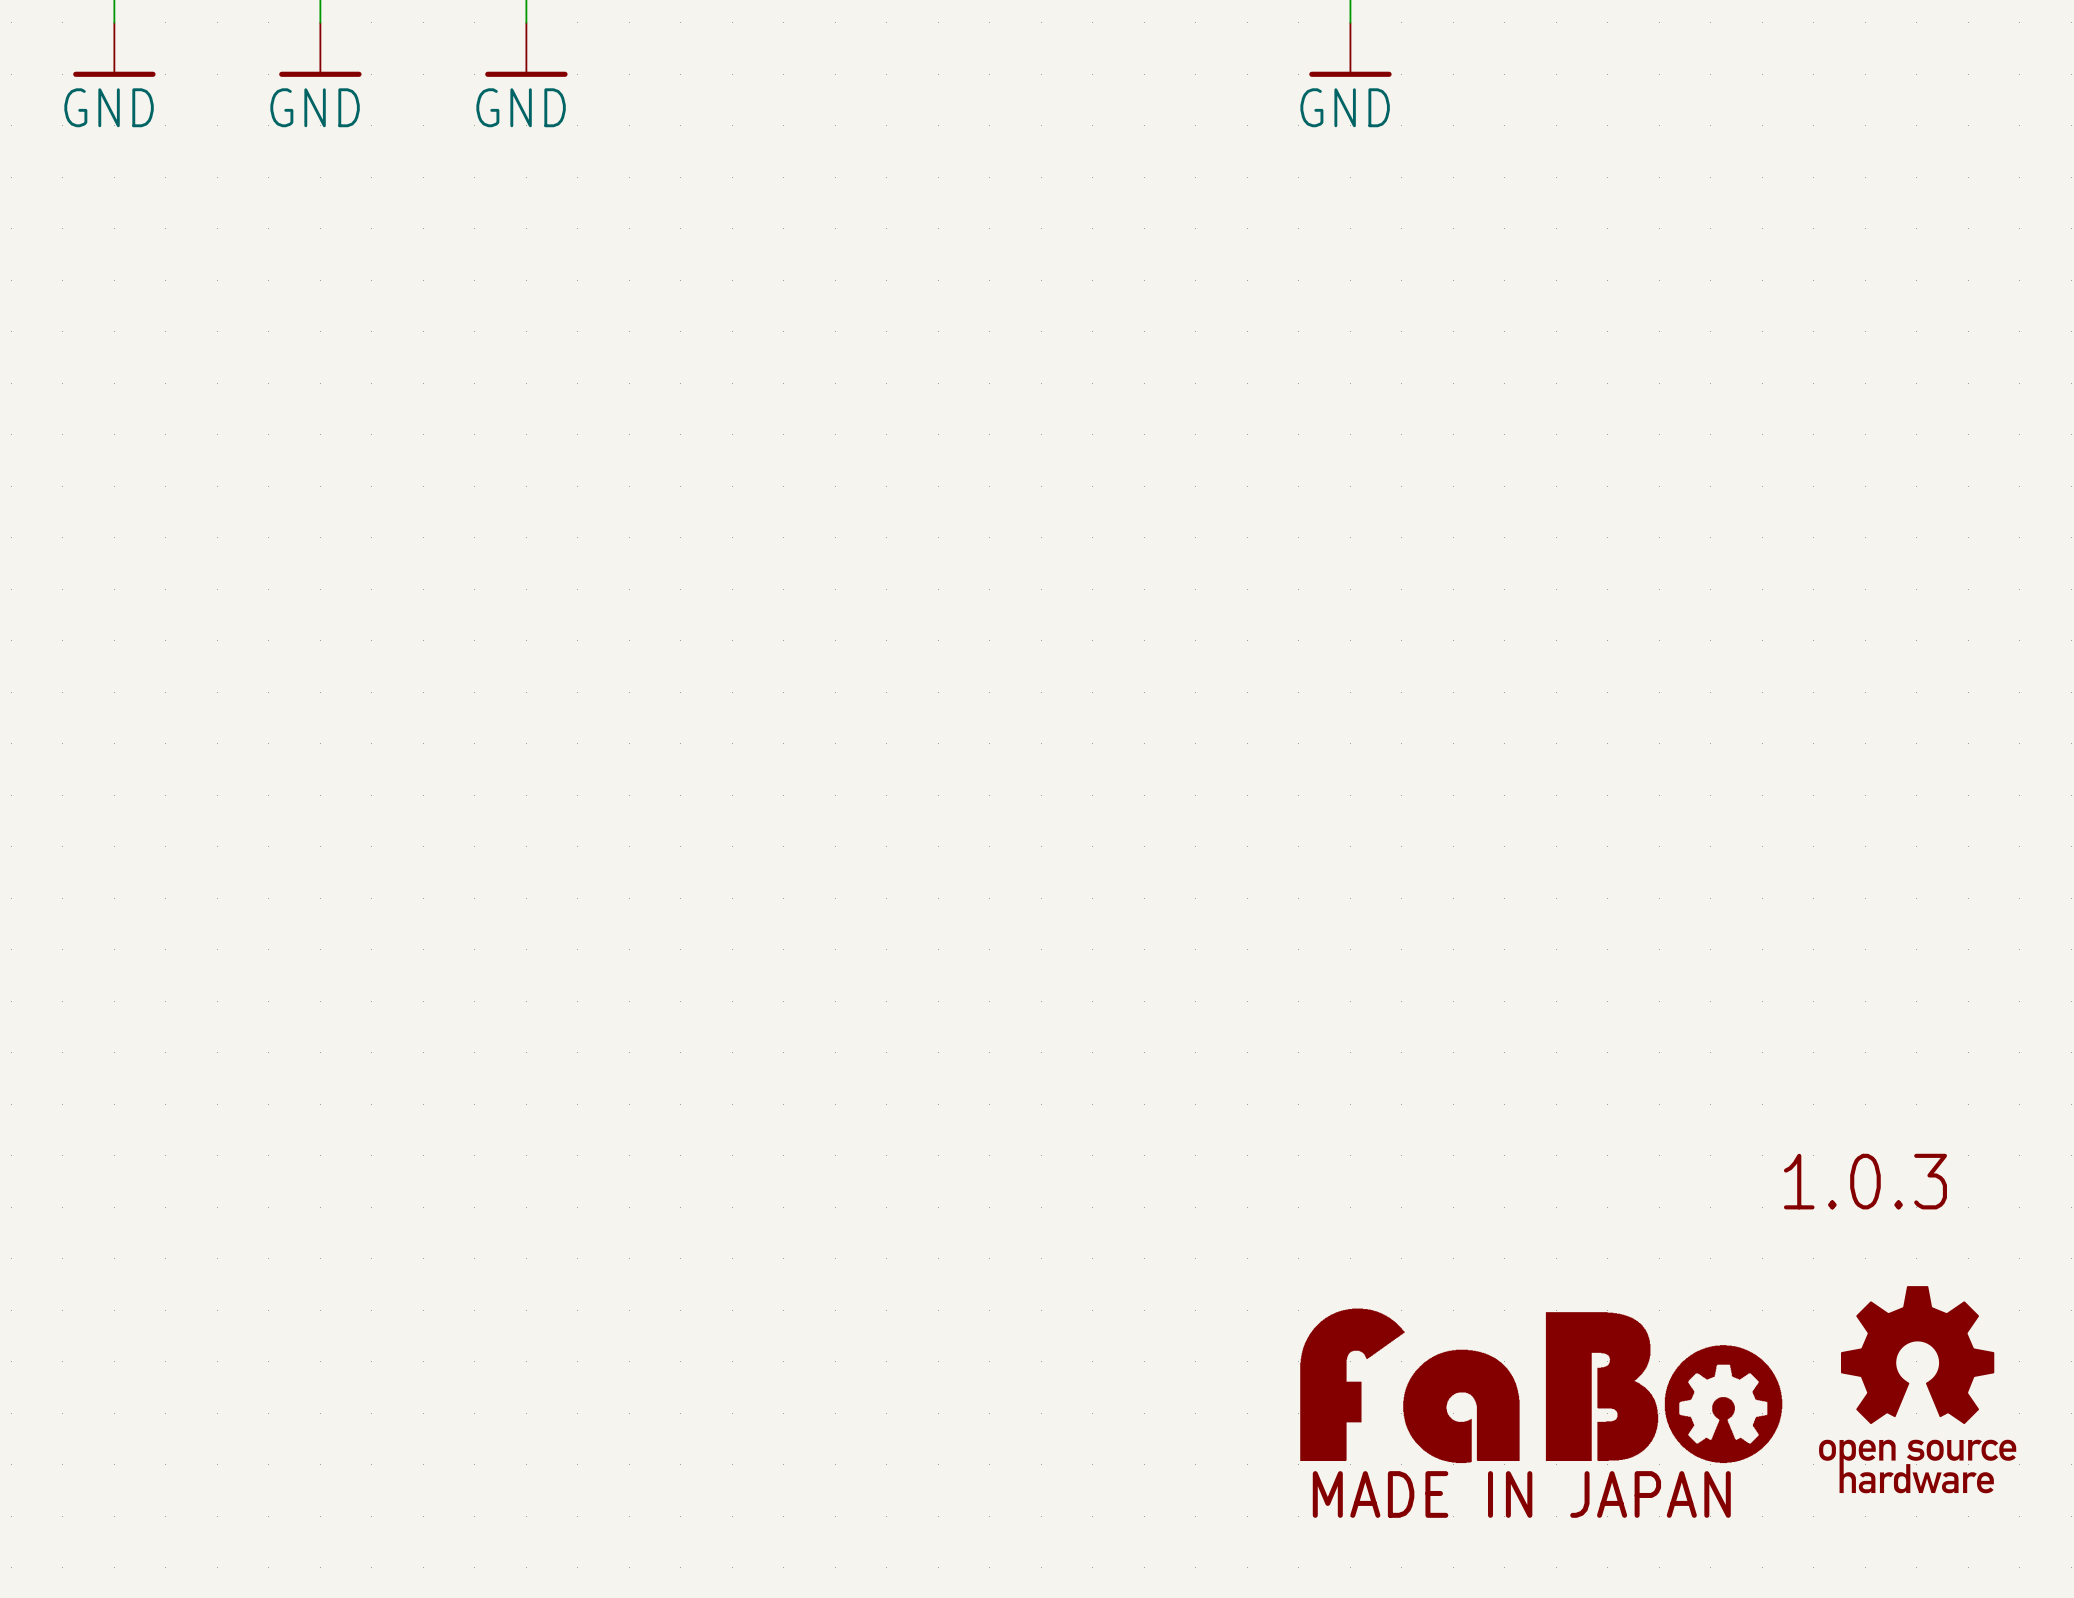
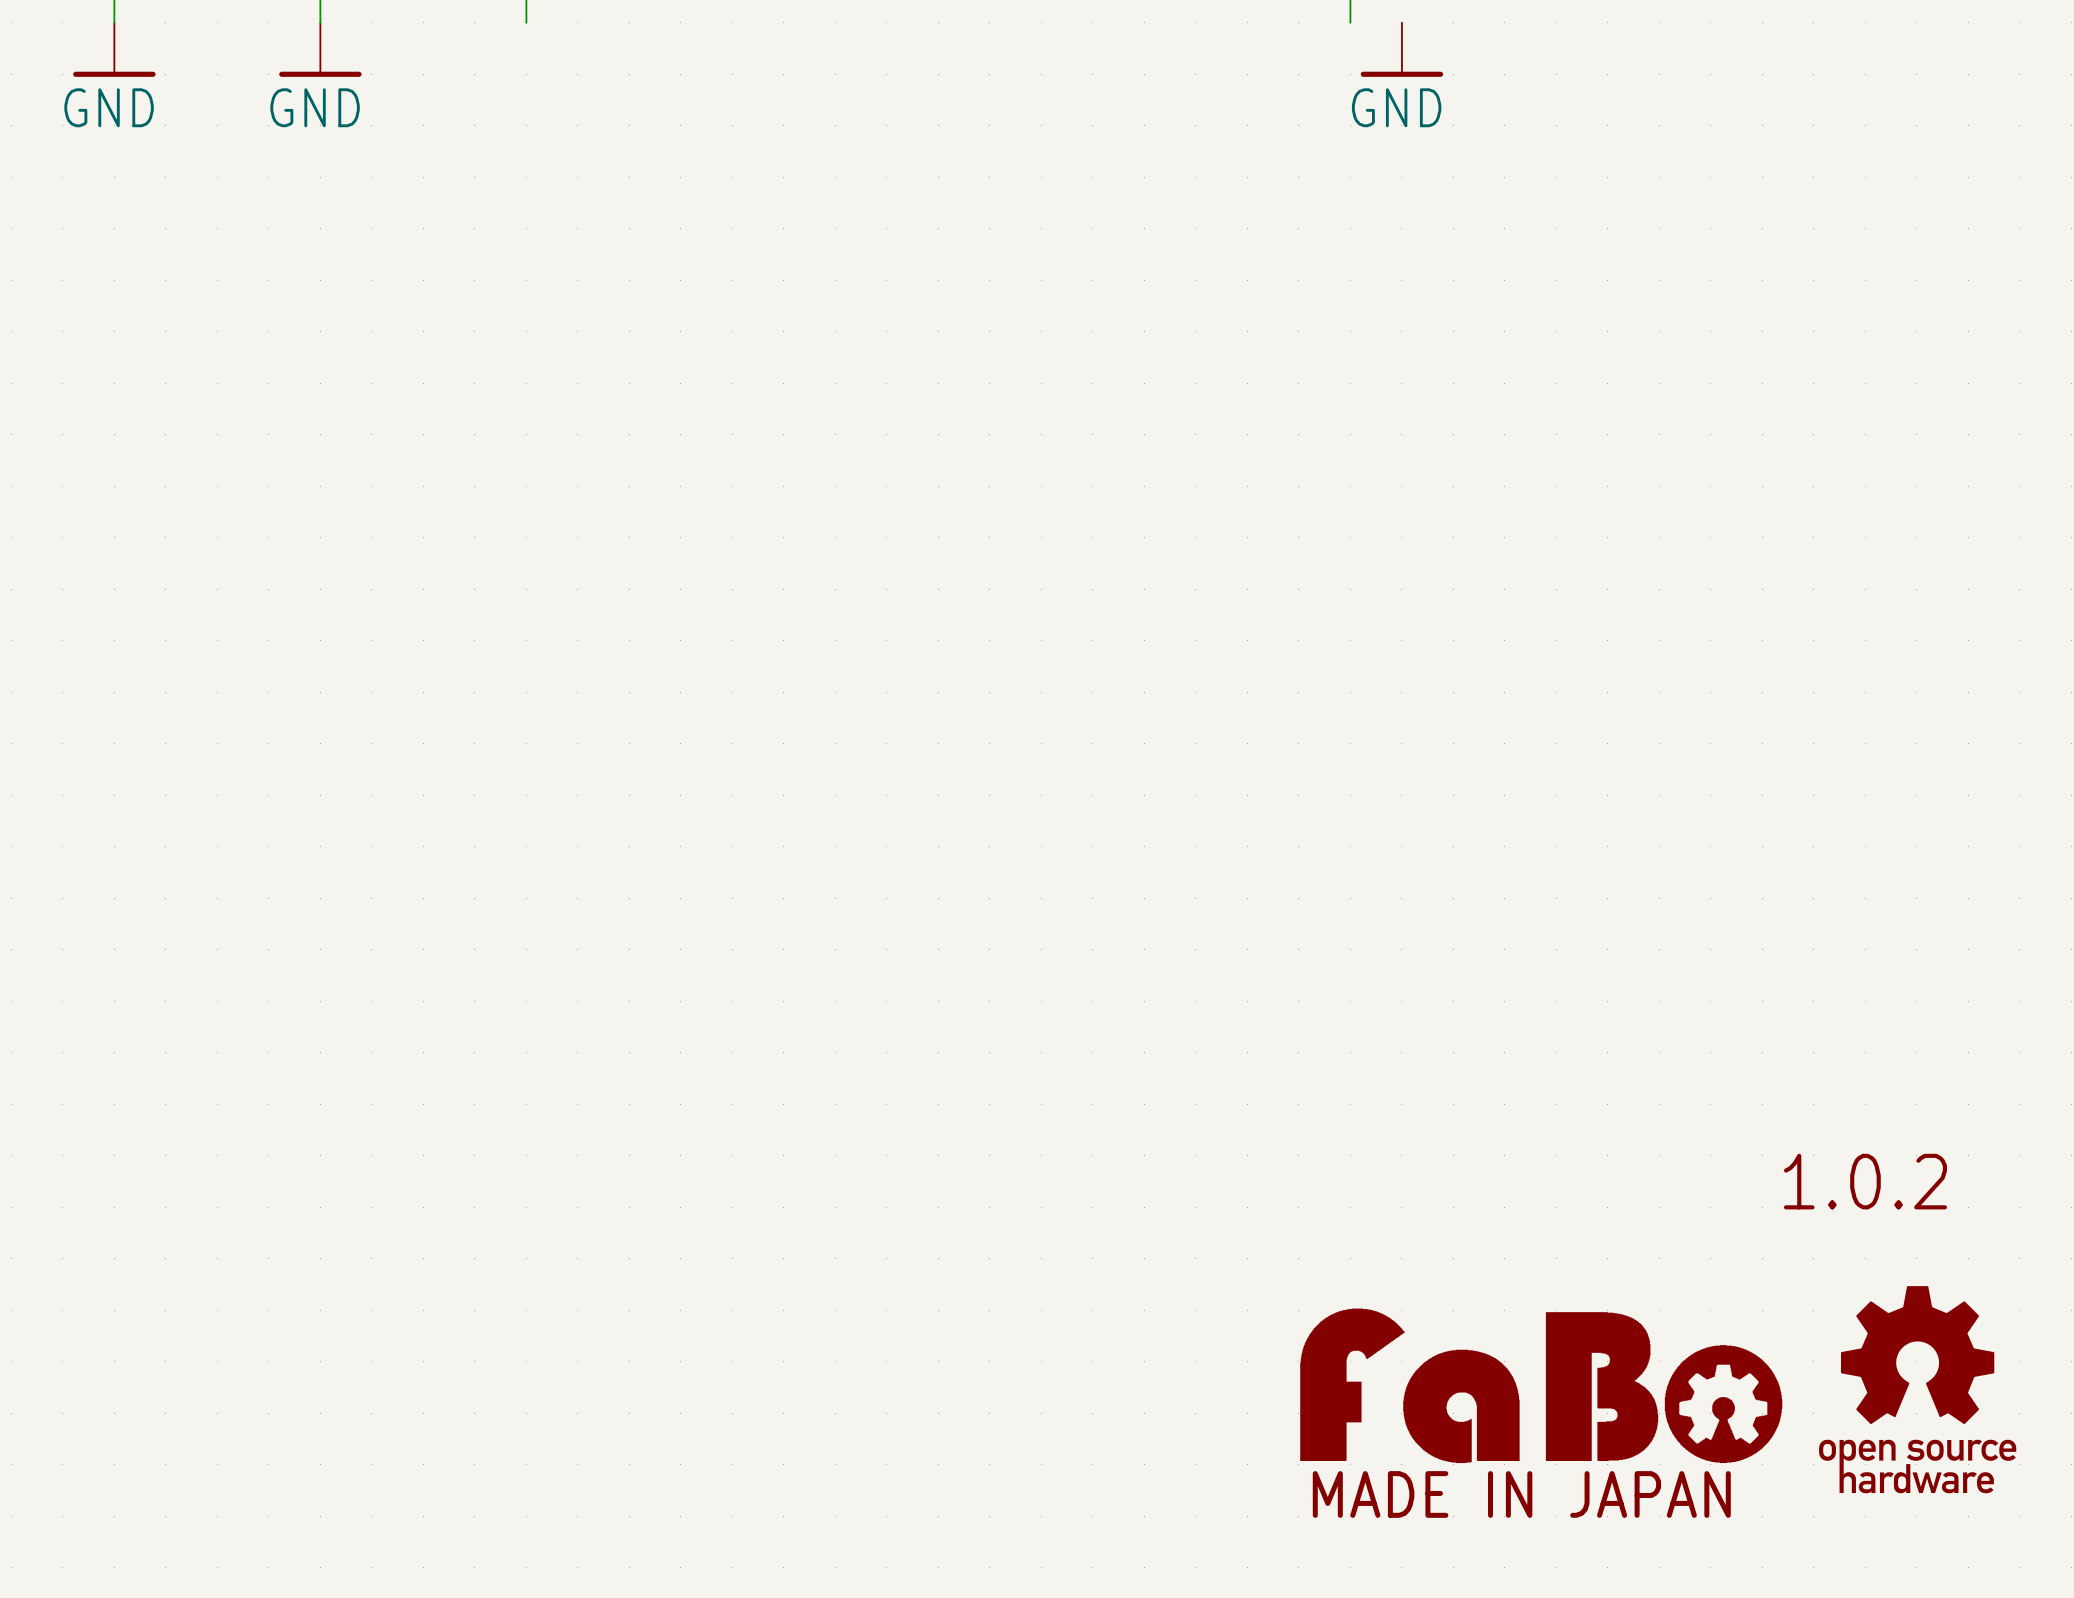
power symbol: GND (526, 49) -> none
power symbol position: GND (1350, 49) -> GND (1401, 49)
text: 1.0.3 (1865, 1181) -> 1.0.2 (1865, 1181)

